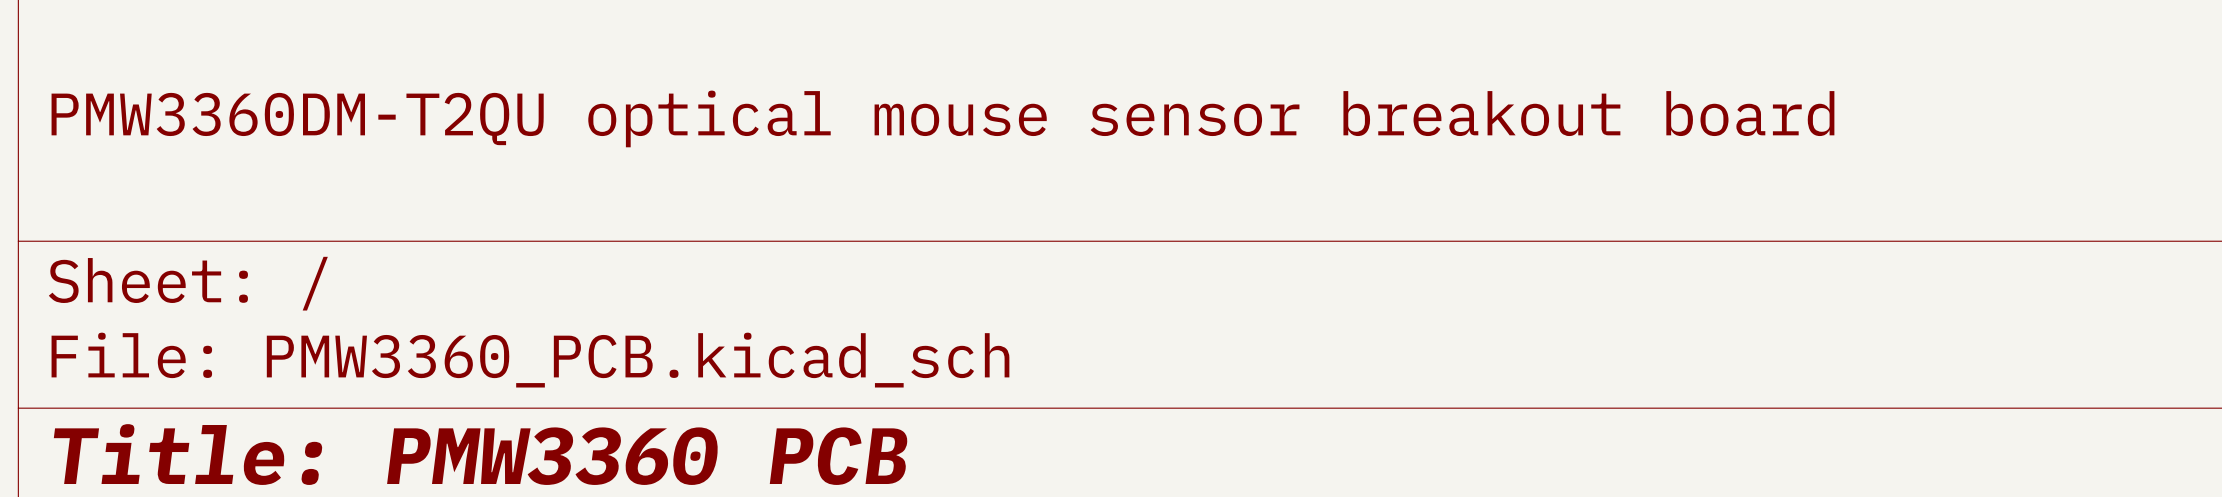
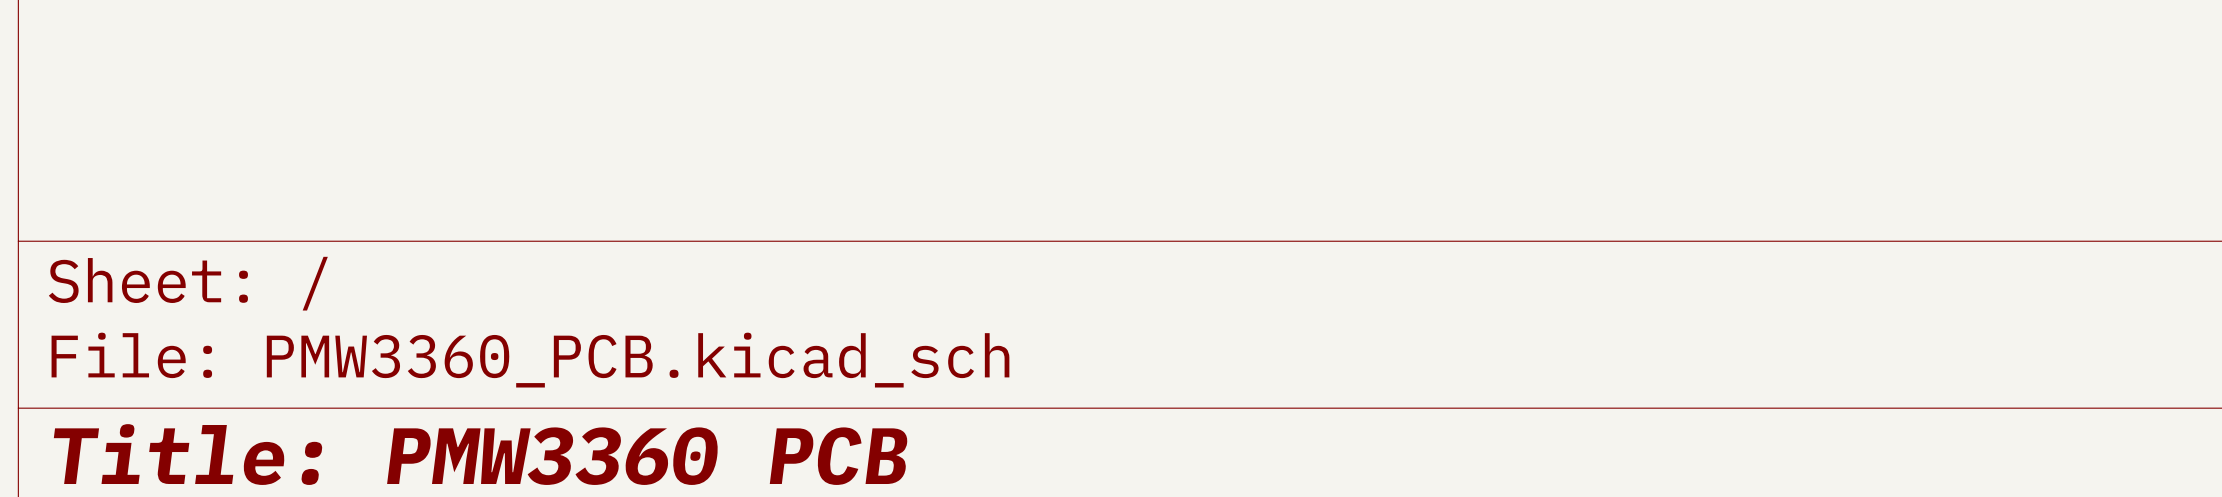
title block: PMW3360DM-T2QU optical mouse sensor breakout board (942, 118) -> none

